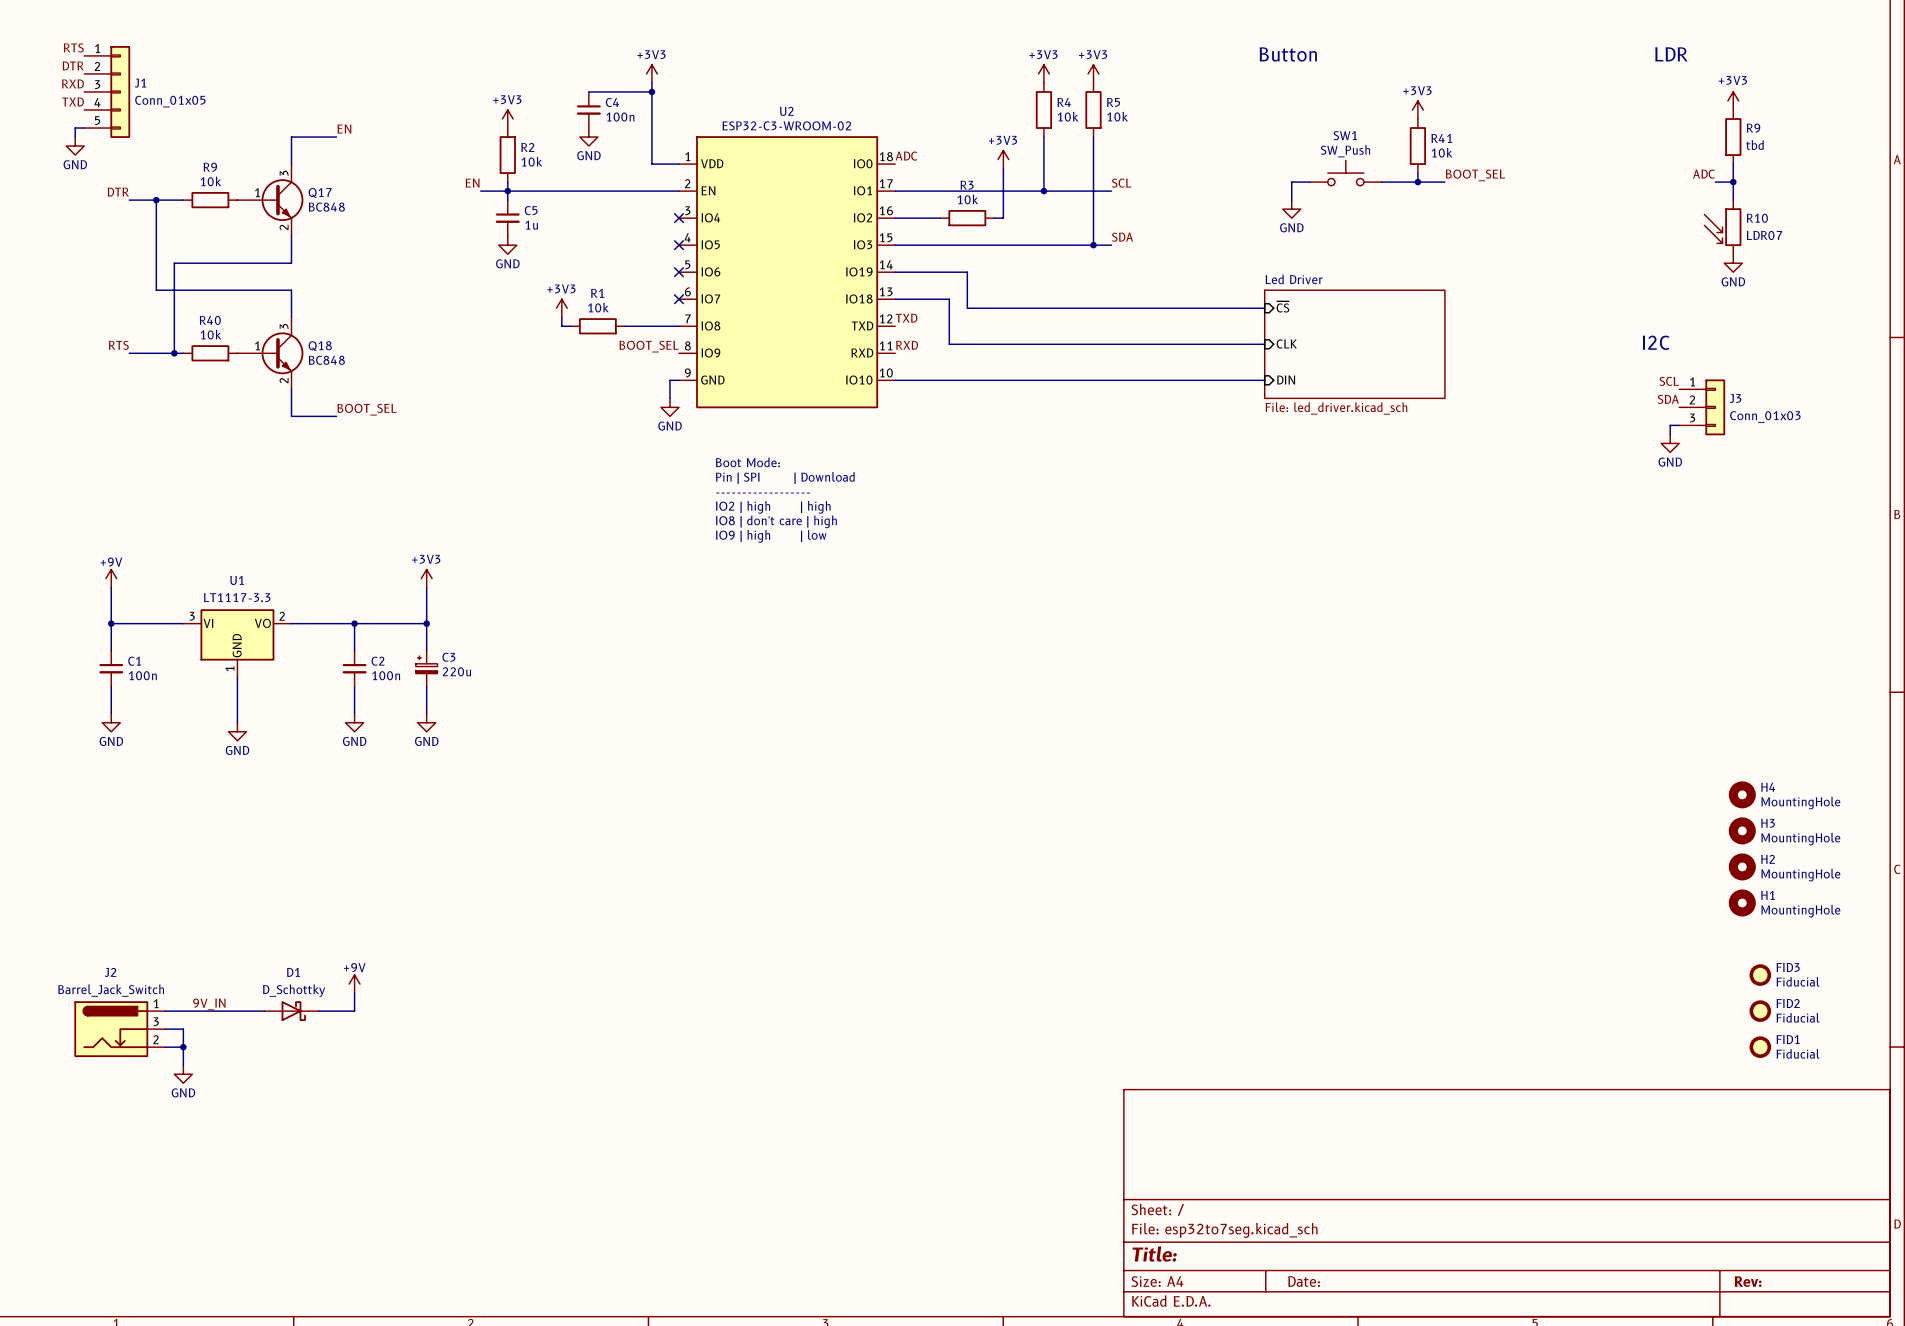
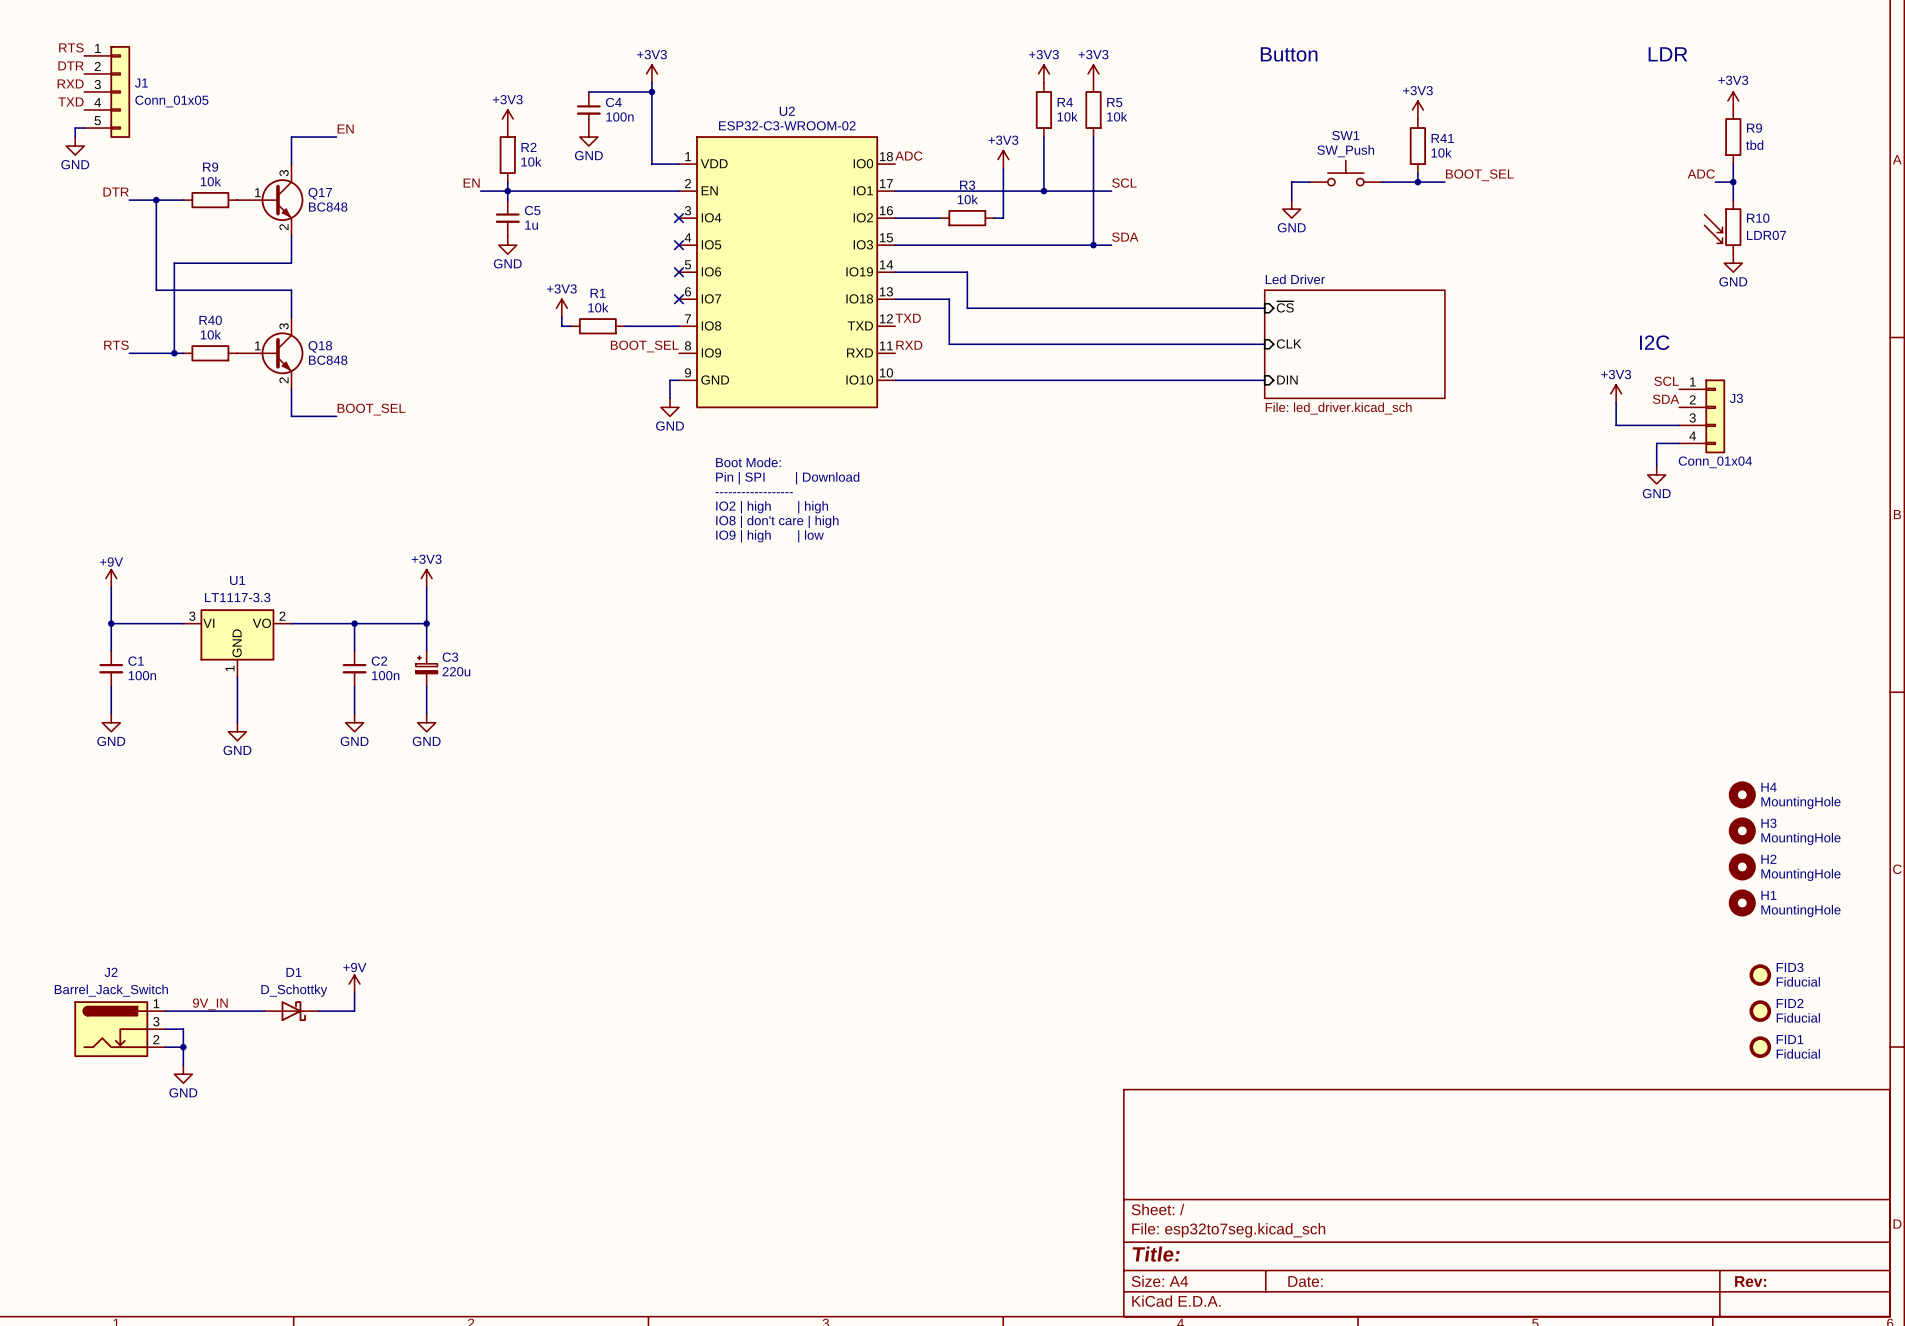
J3 symbol: [1679, 379, 1726, 436] -> [1679, 379, 1726, 454]
power symbol: none -> +3V3 (1616, 393)
J3 value: Conn_01x03 (1765, 416) -> Conn_01x04 (1715, 462)
wire: (1670, 425) (1670, 434) -> (1670, 425) (1616, 425) (1616, 402)
power symbol position: GND (1670, 443) -> GND (1656, 474)
wire: none -> (1679, 443) (1656, 443) (1656, 465)

